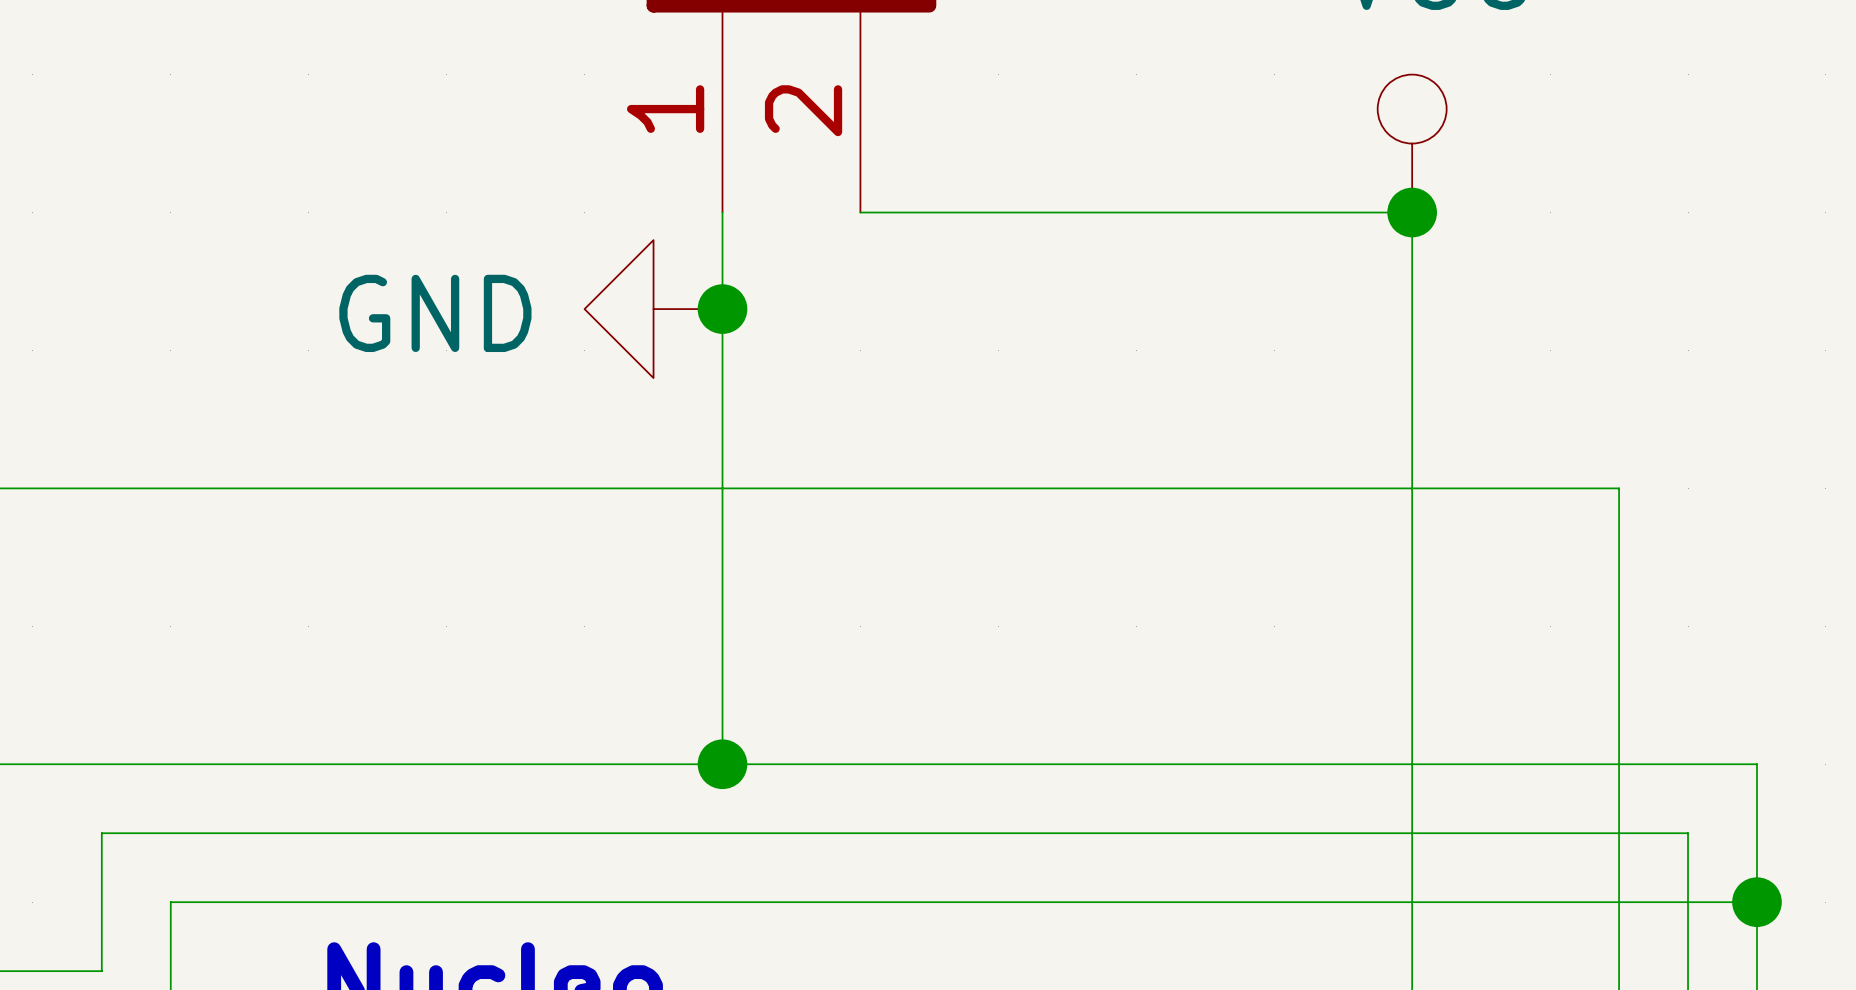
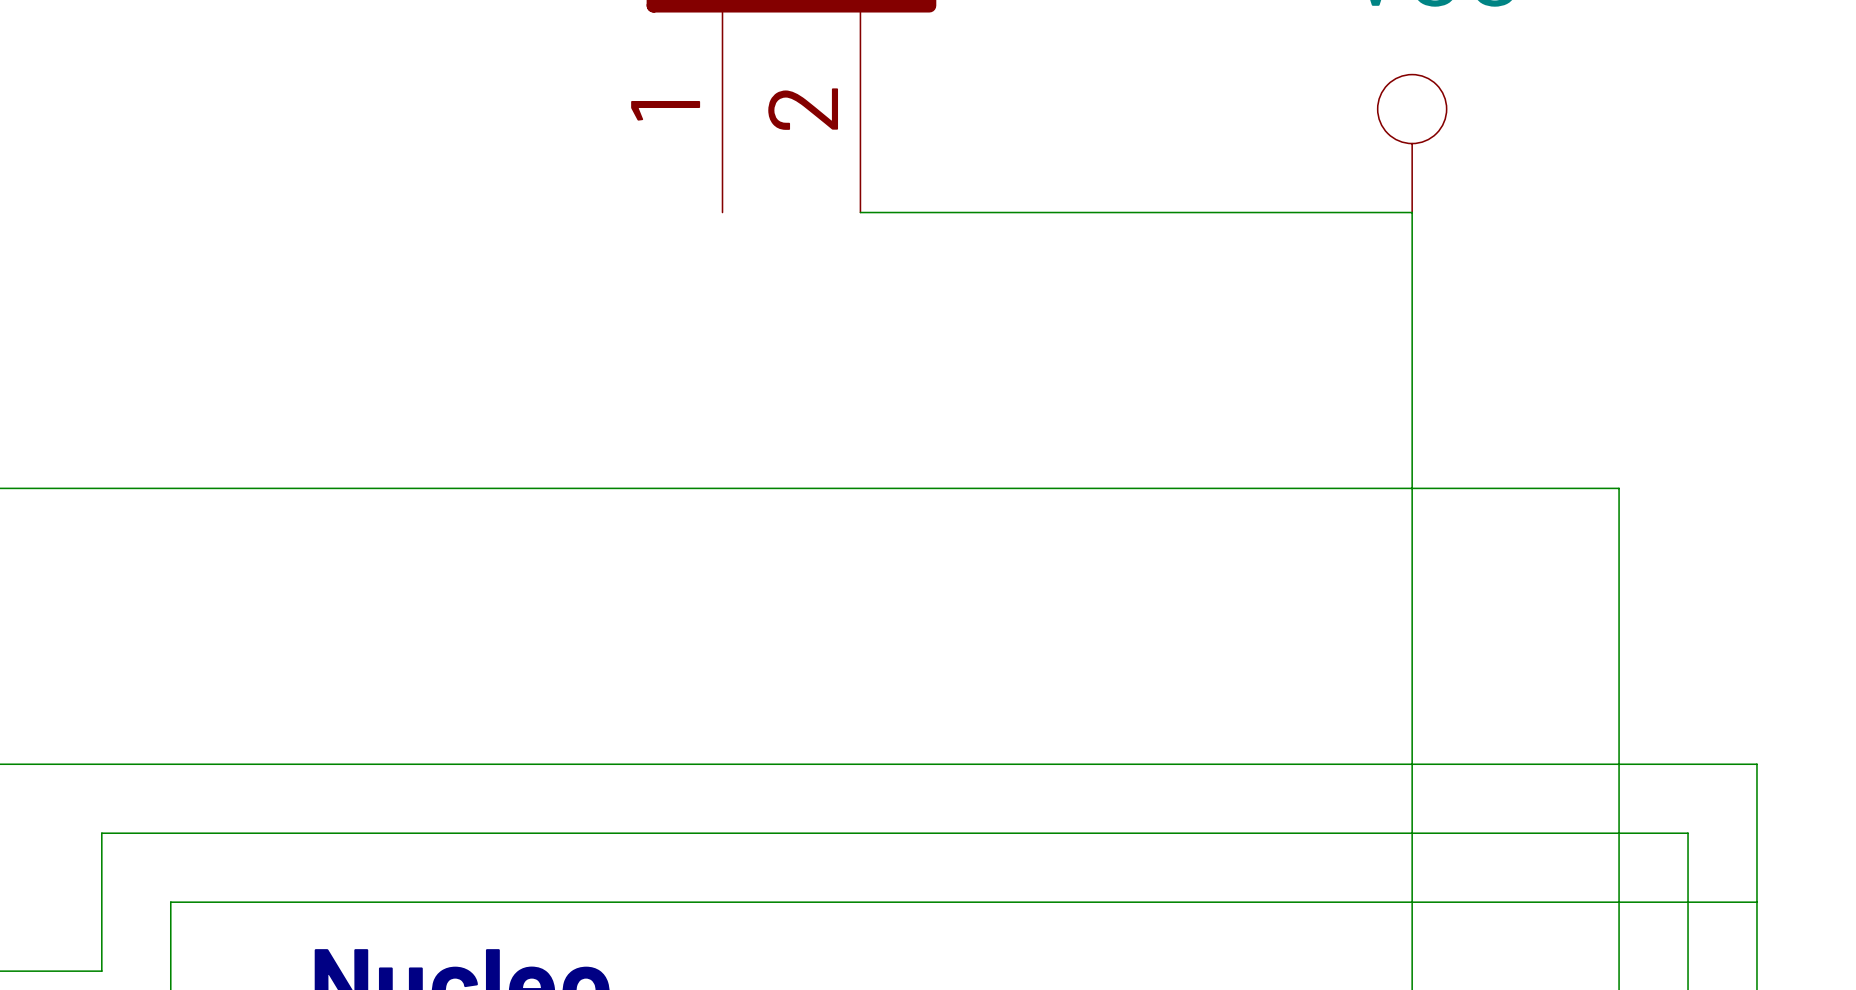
wire: (722, 212) (722, 764) -> none
junction: (1412, 212) -> none
power symbol: GND (653, 309) -> none
junction: (722, 309) -> none
junction: (722, 764) -> none
junction: (1756, 902) -> none

